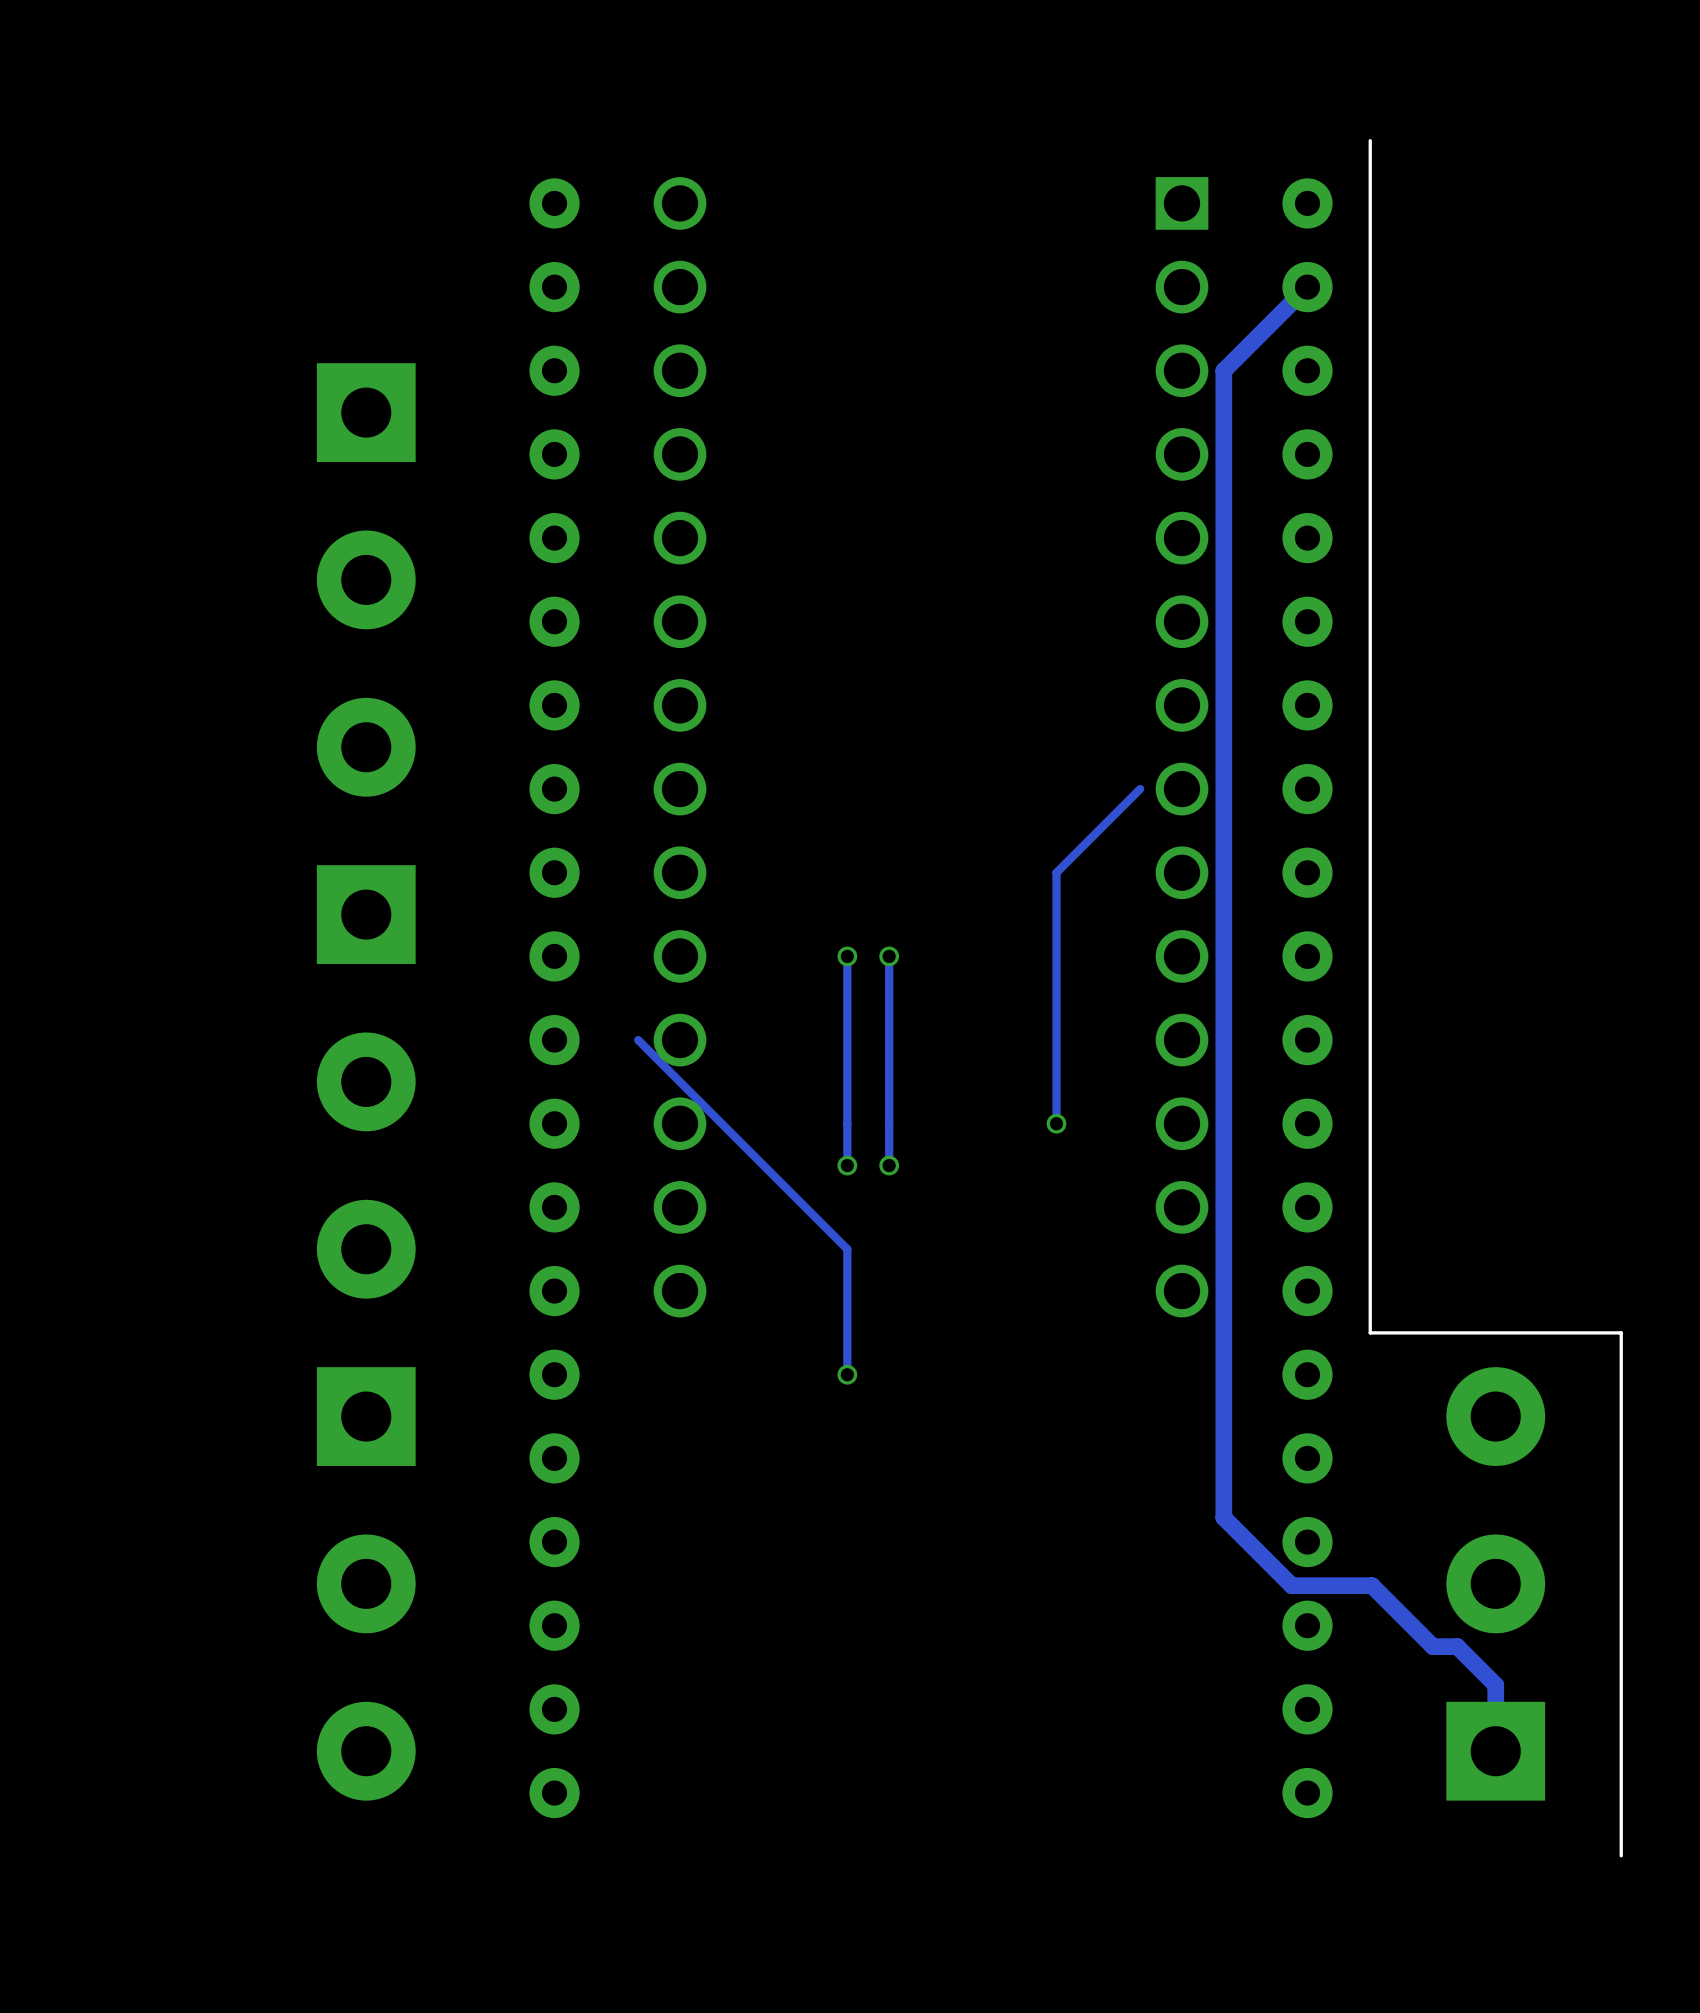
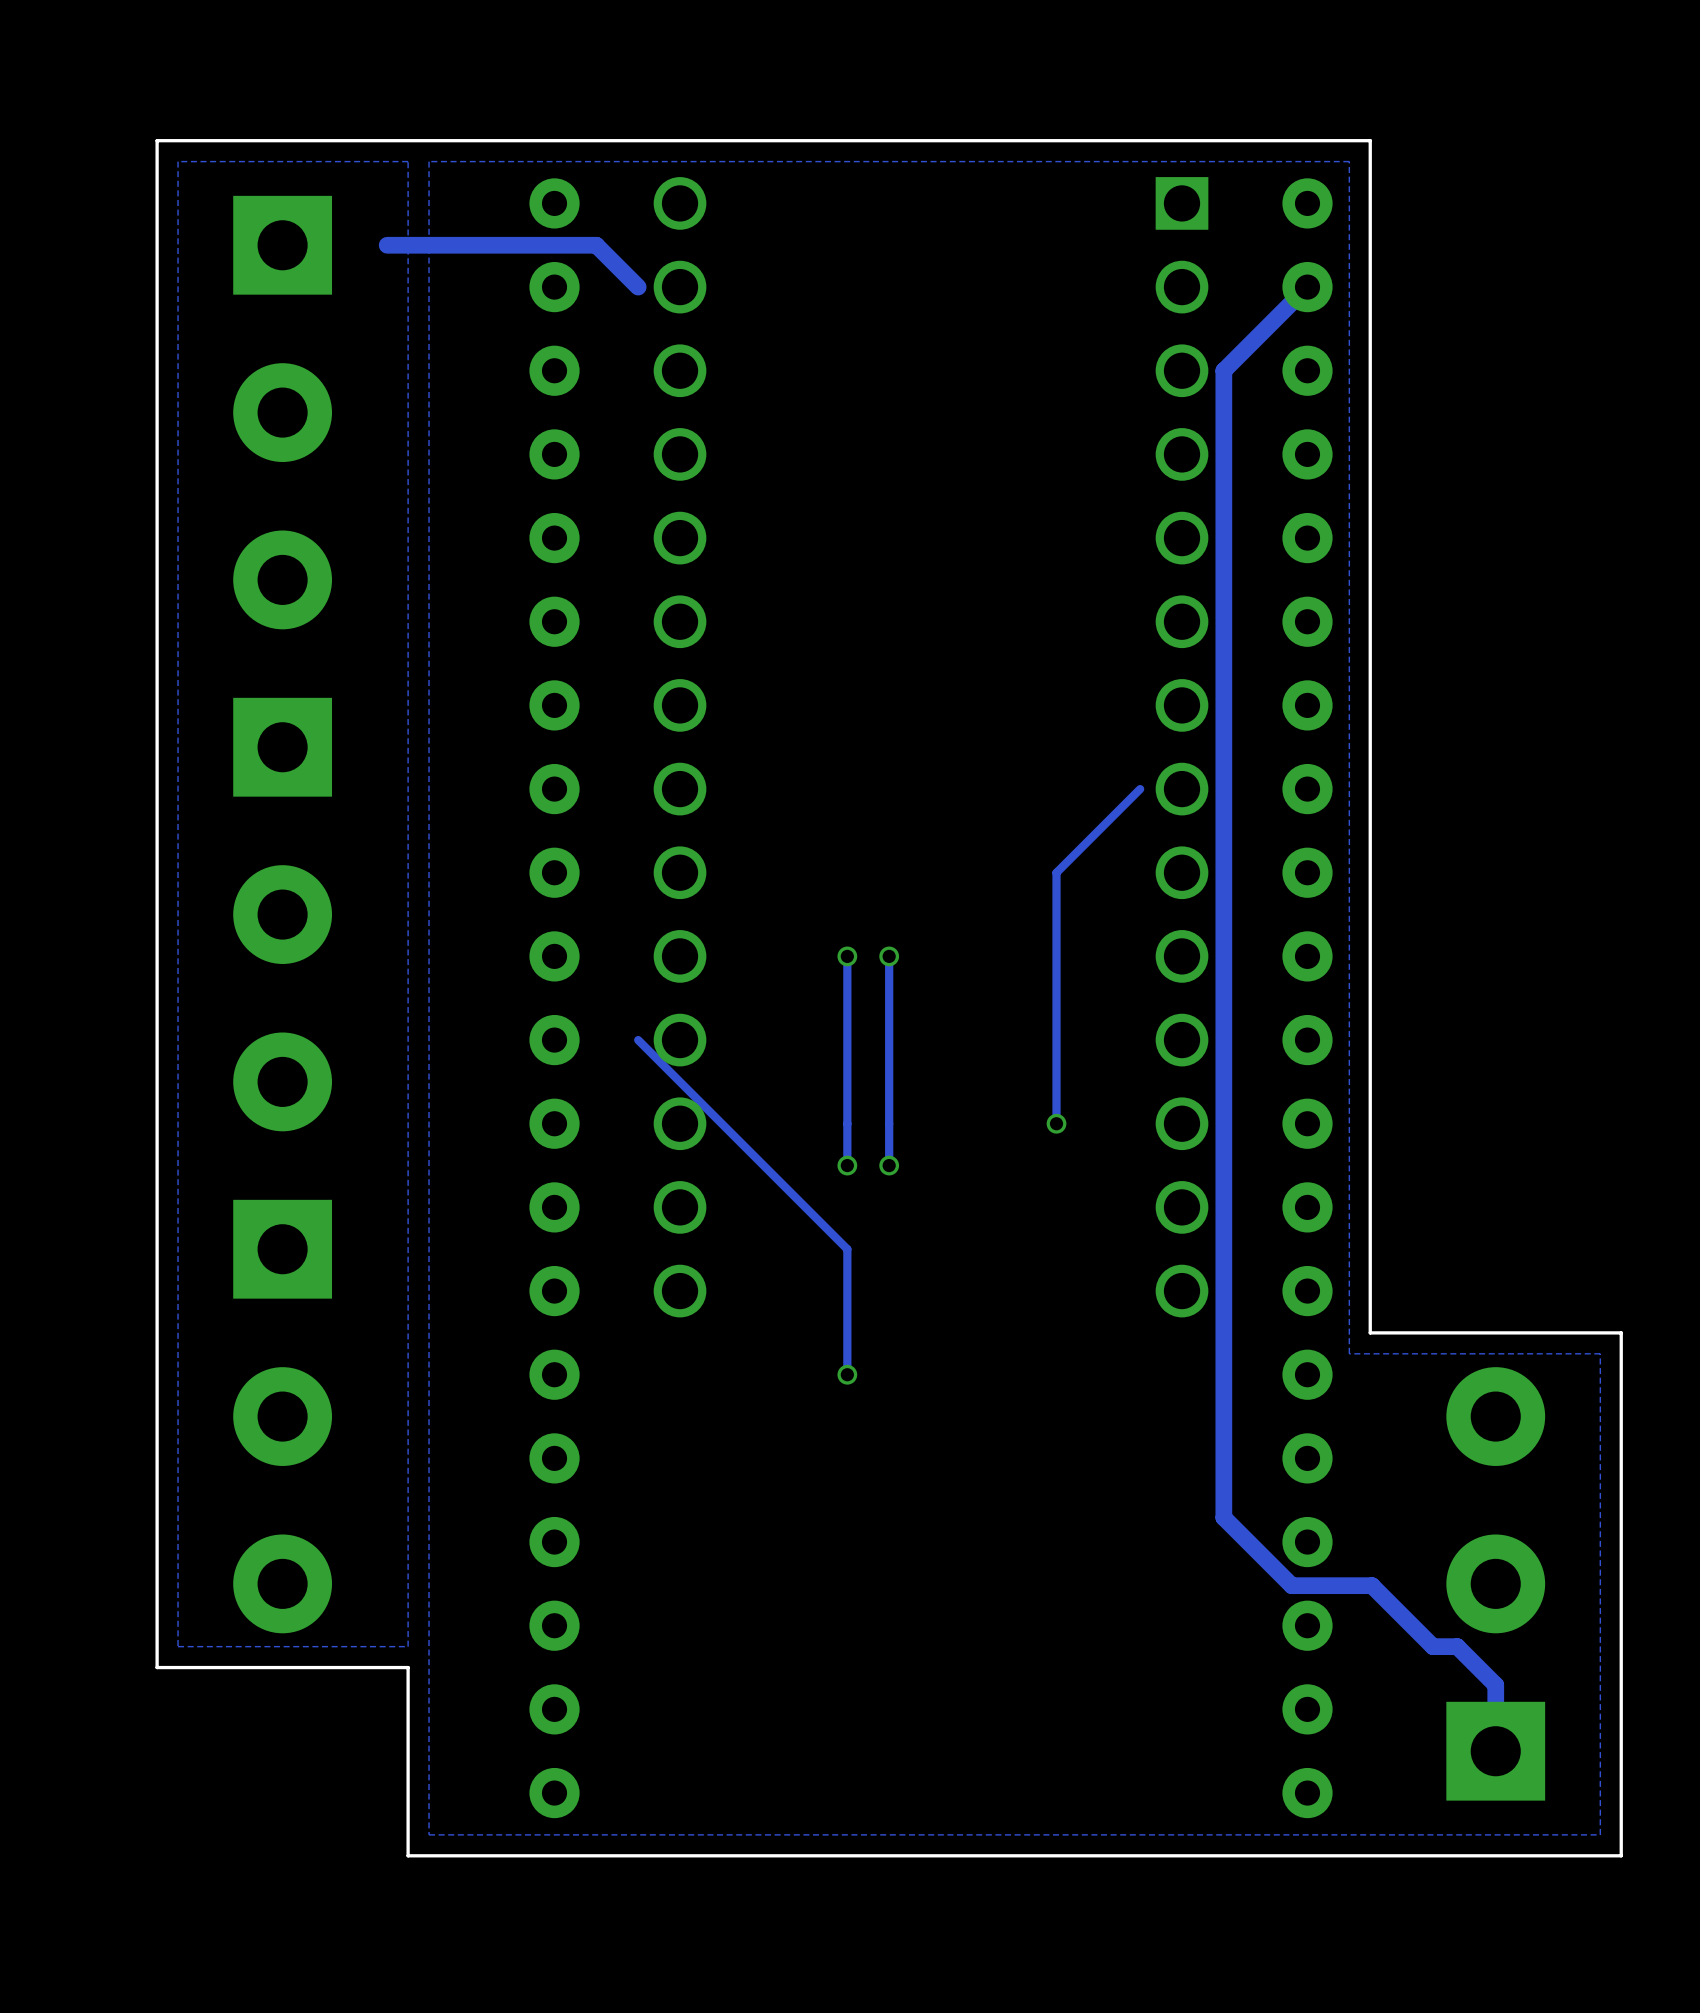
board edge: none -> (1370, 140) (157, 140) (157, 1667) (408, 1667) (408, 1855) (1621, 1855)
zone outline: none -> (408, 161) (178, 161) (178, 1646) (408, 1646) (408, 161)
zone outline: none -> (1349, 161) (429, 161) (429, 1834) (1600, 1834) (1600, 1353) (1349, 1353) (1349, 161)
track: none -> (387, 245) (596, 245) (638, 287)
part: none -> (282, 412)
part: (366, 579) -> none
part: none -> (282, 914)
part: (366, 1081) -> none
part: none -> (282, 1416)
part: (366, 1583) -> none

